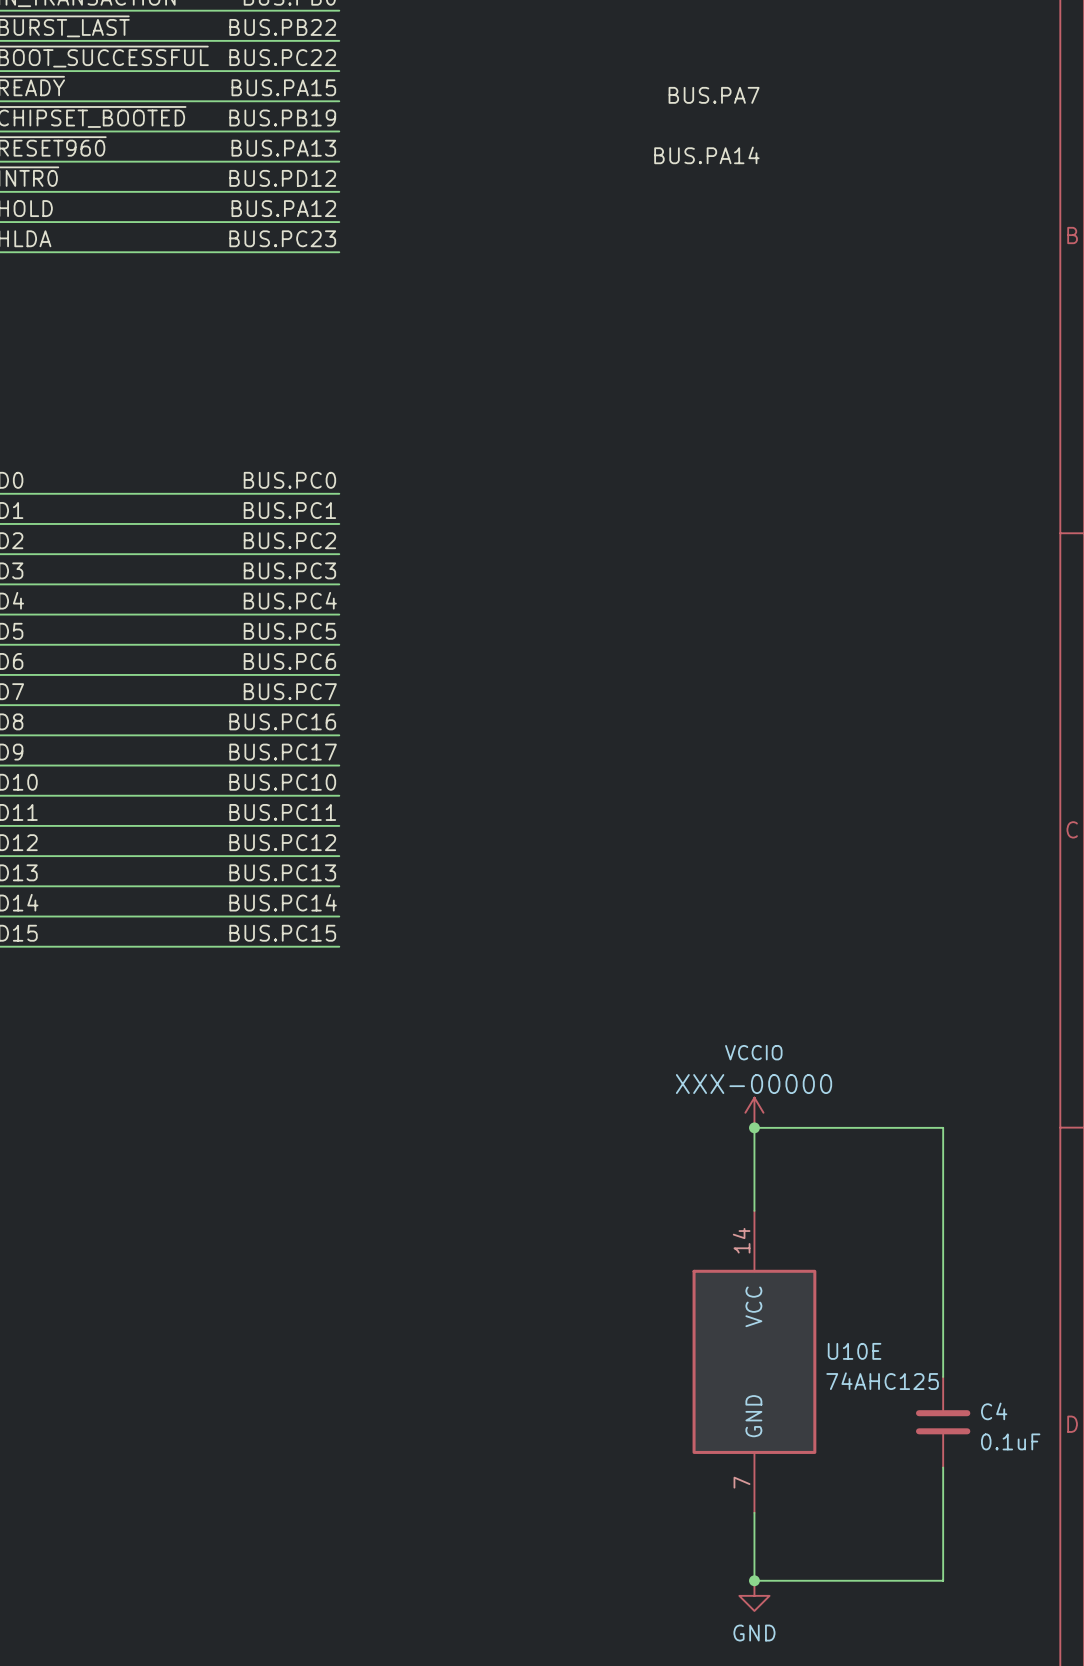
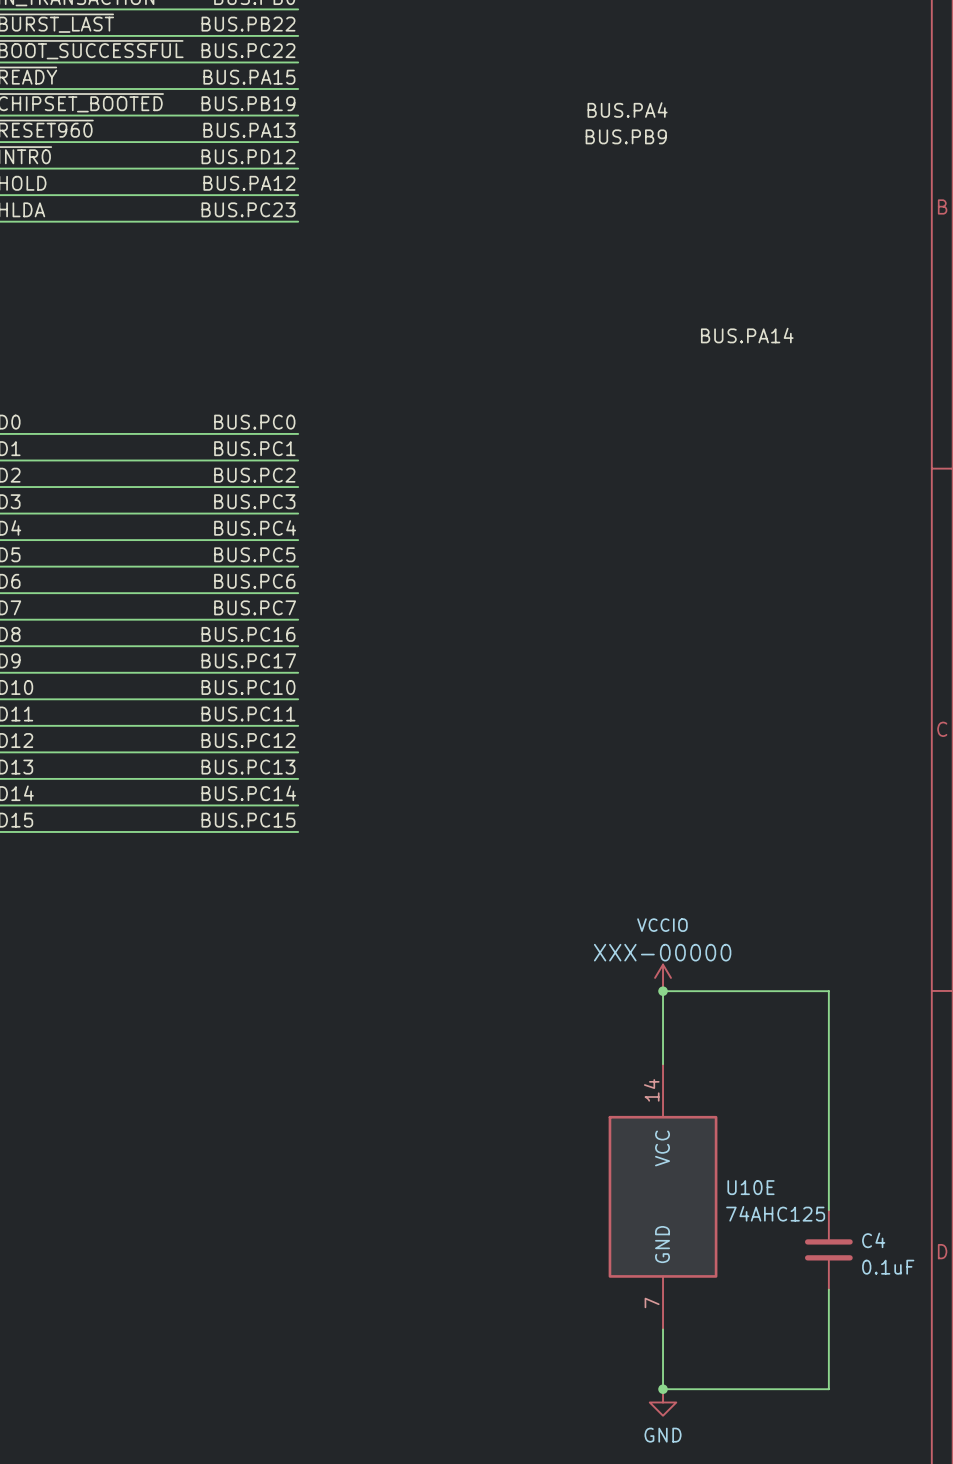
label: BUS.PA7 (714, 95) -> BUS.PA4 (627, 110)
label: BUS.PA14 (706, 155) -> BUS.PB9 (626, 136)
label: none -> BUS.PA14 (747, 335)

